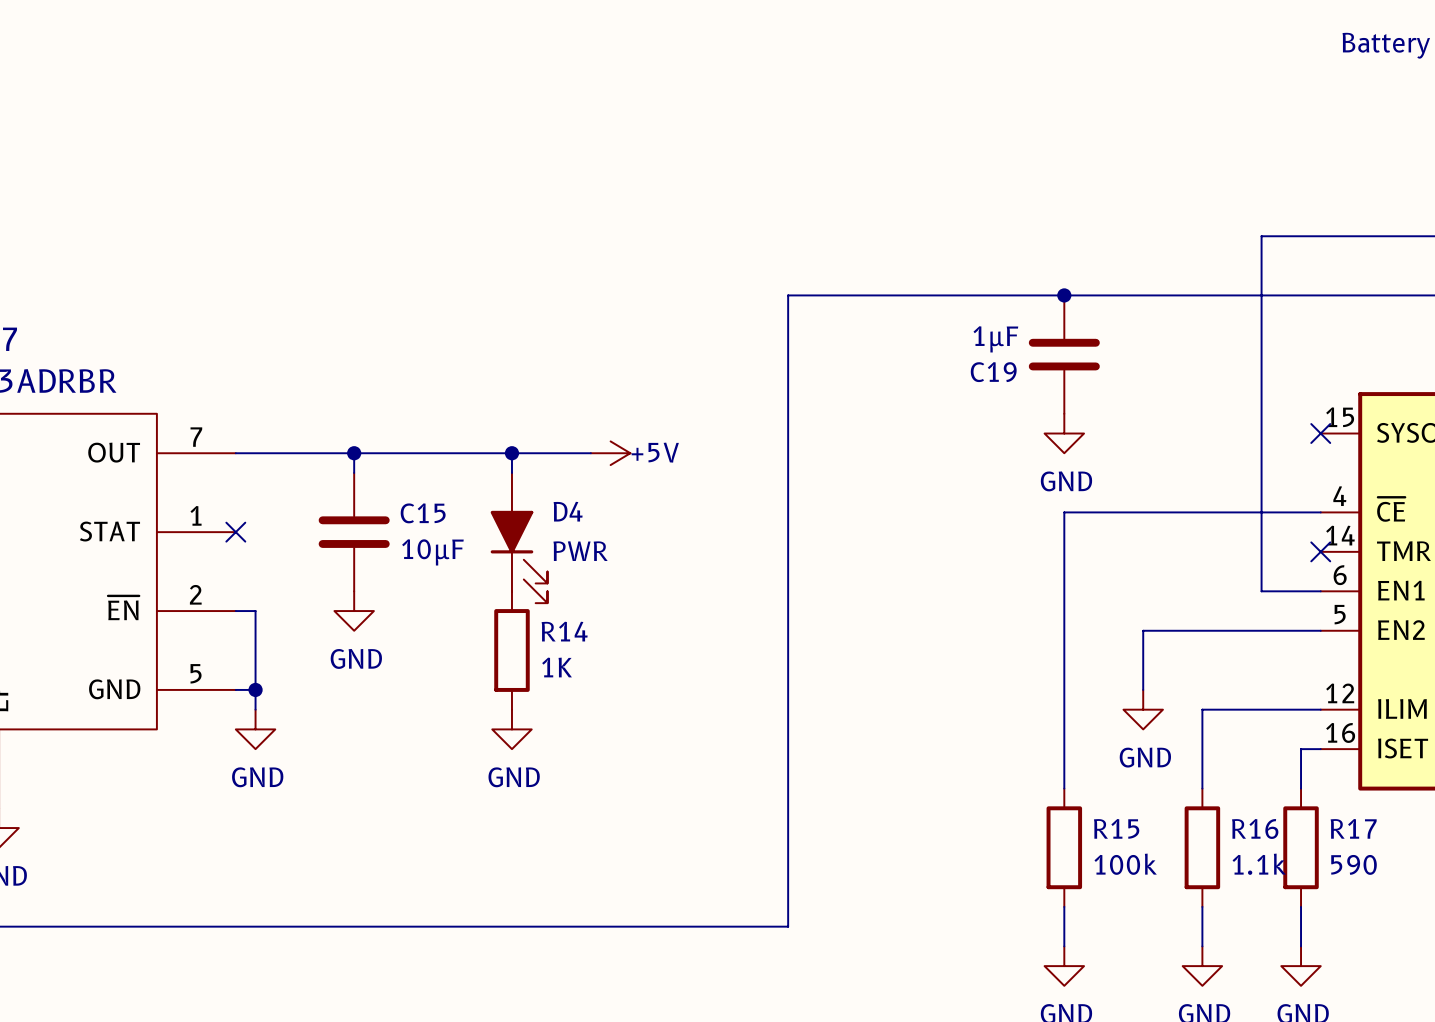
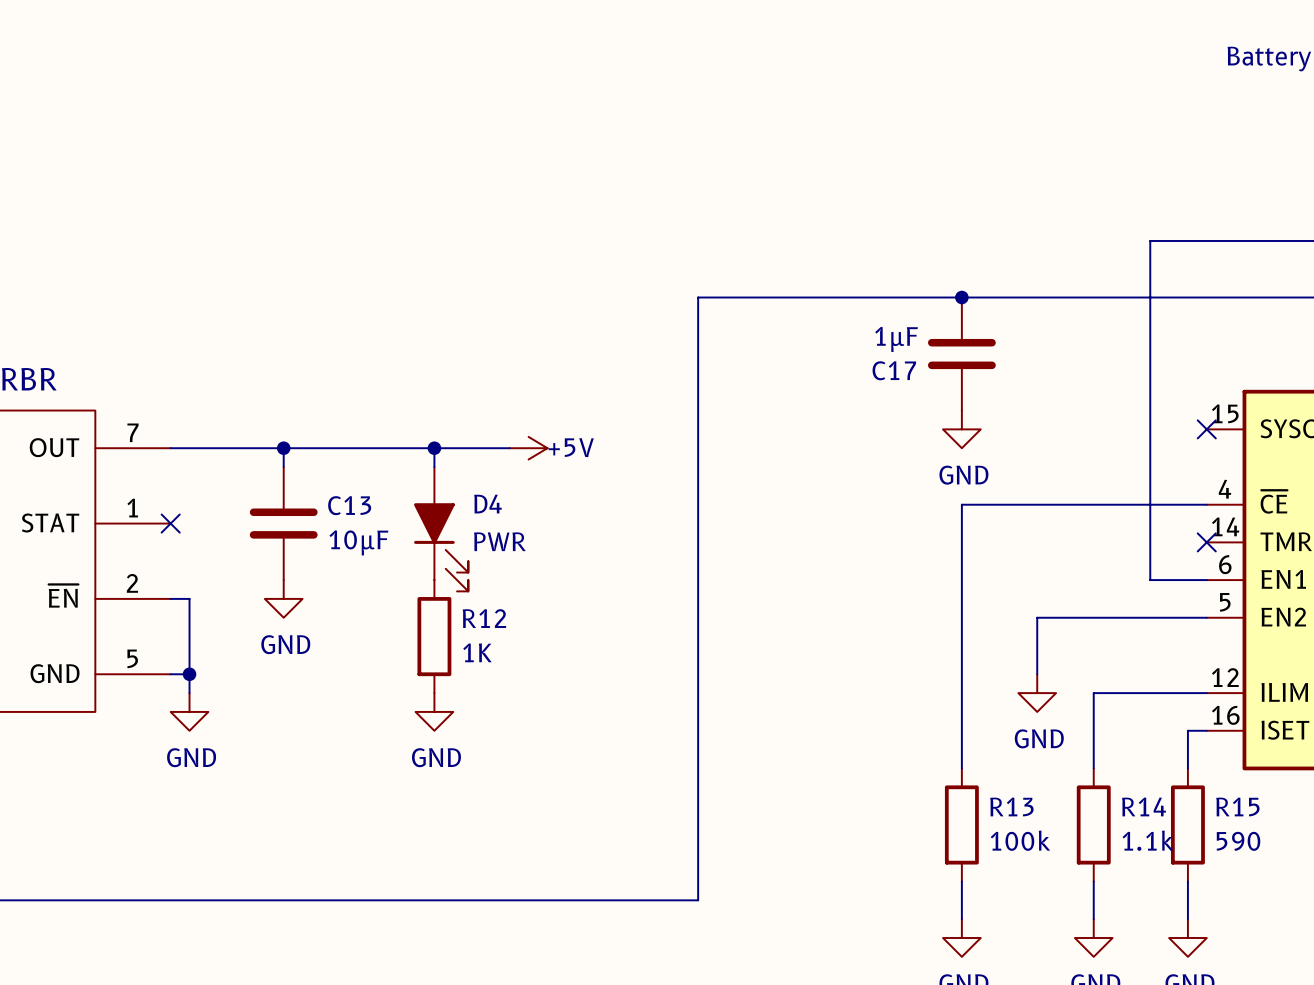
C19 name: C19 (993, 372) -> C17 (894, 370)
C15 name: C15 (423, 513) -> C13 (349, 505)
R14 name: R14 (564, 631) -> R12 (484, 618)
R15 name: R15 (1116, 828) -> R13 (1011, 806)
R16 name: R16 (1255, 828) -> R14 (1144, 806)
R17 name: R17 (1353, 828) -> R15 (1237, 806)

